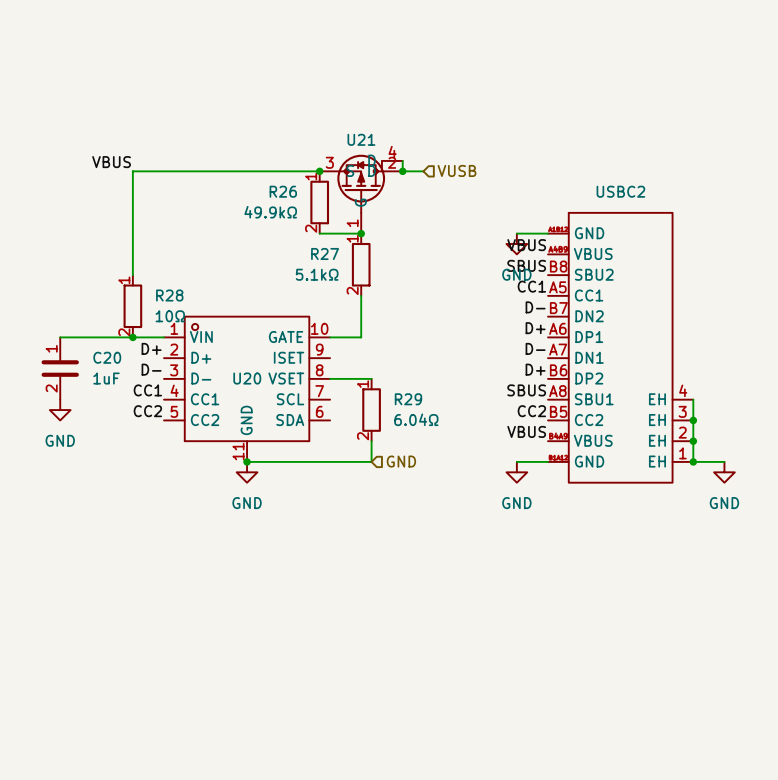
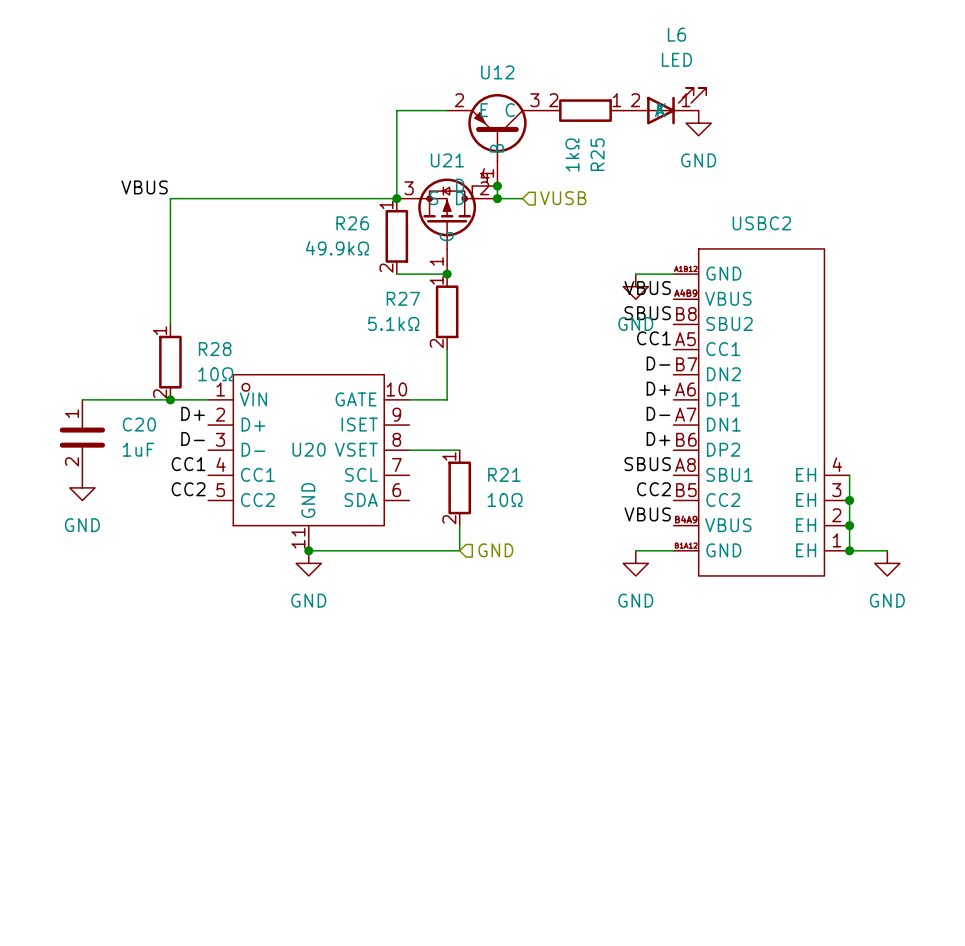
L6: none -> LED (664, 106)
wire: none -> (447, 110) (396, 110) (396, 198)
R25: none -> 1kΩ (585, 110)
power symbol: none -> GND (698, 123)
U12: none -> (497, 140)
junction: none -> (497, 186)
R29 name: R29 (408, 399) -> R21 (504, 474)
R29 value: 6.04Ω (416, 419) -> 10Ω (505, 500)

